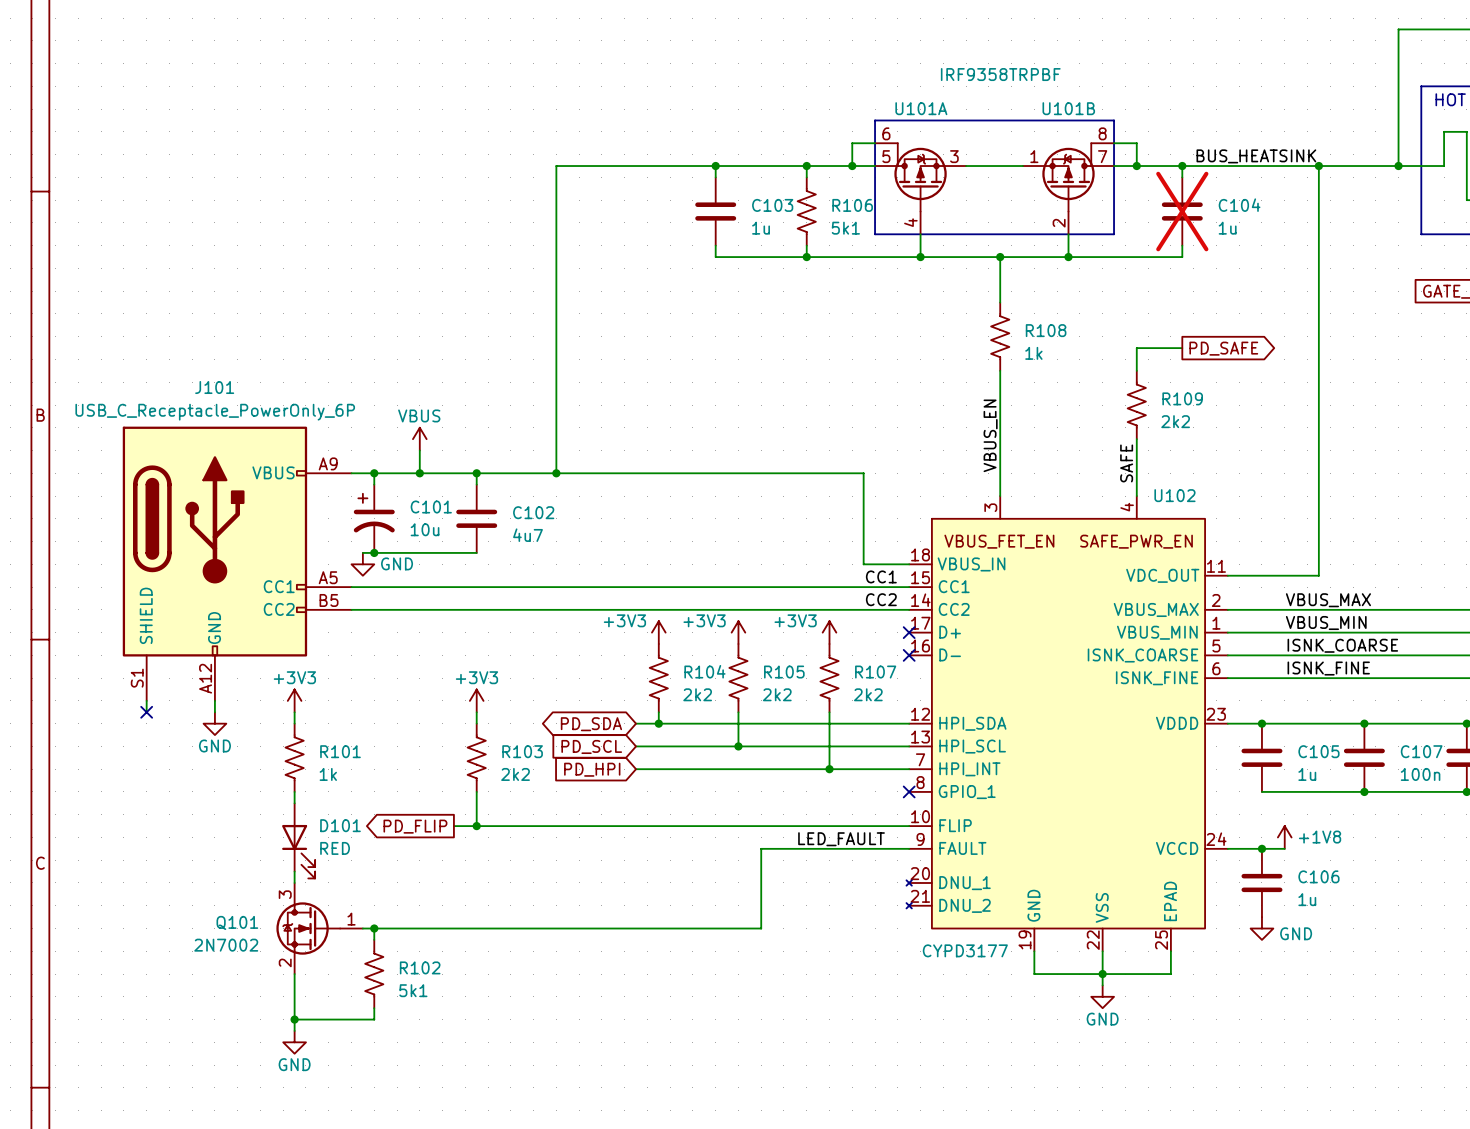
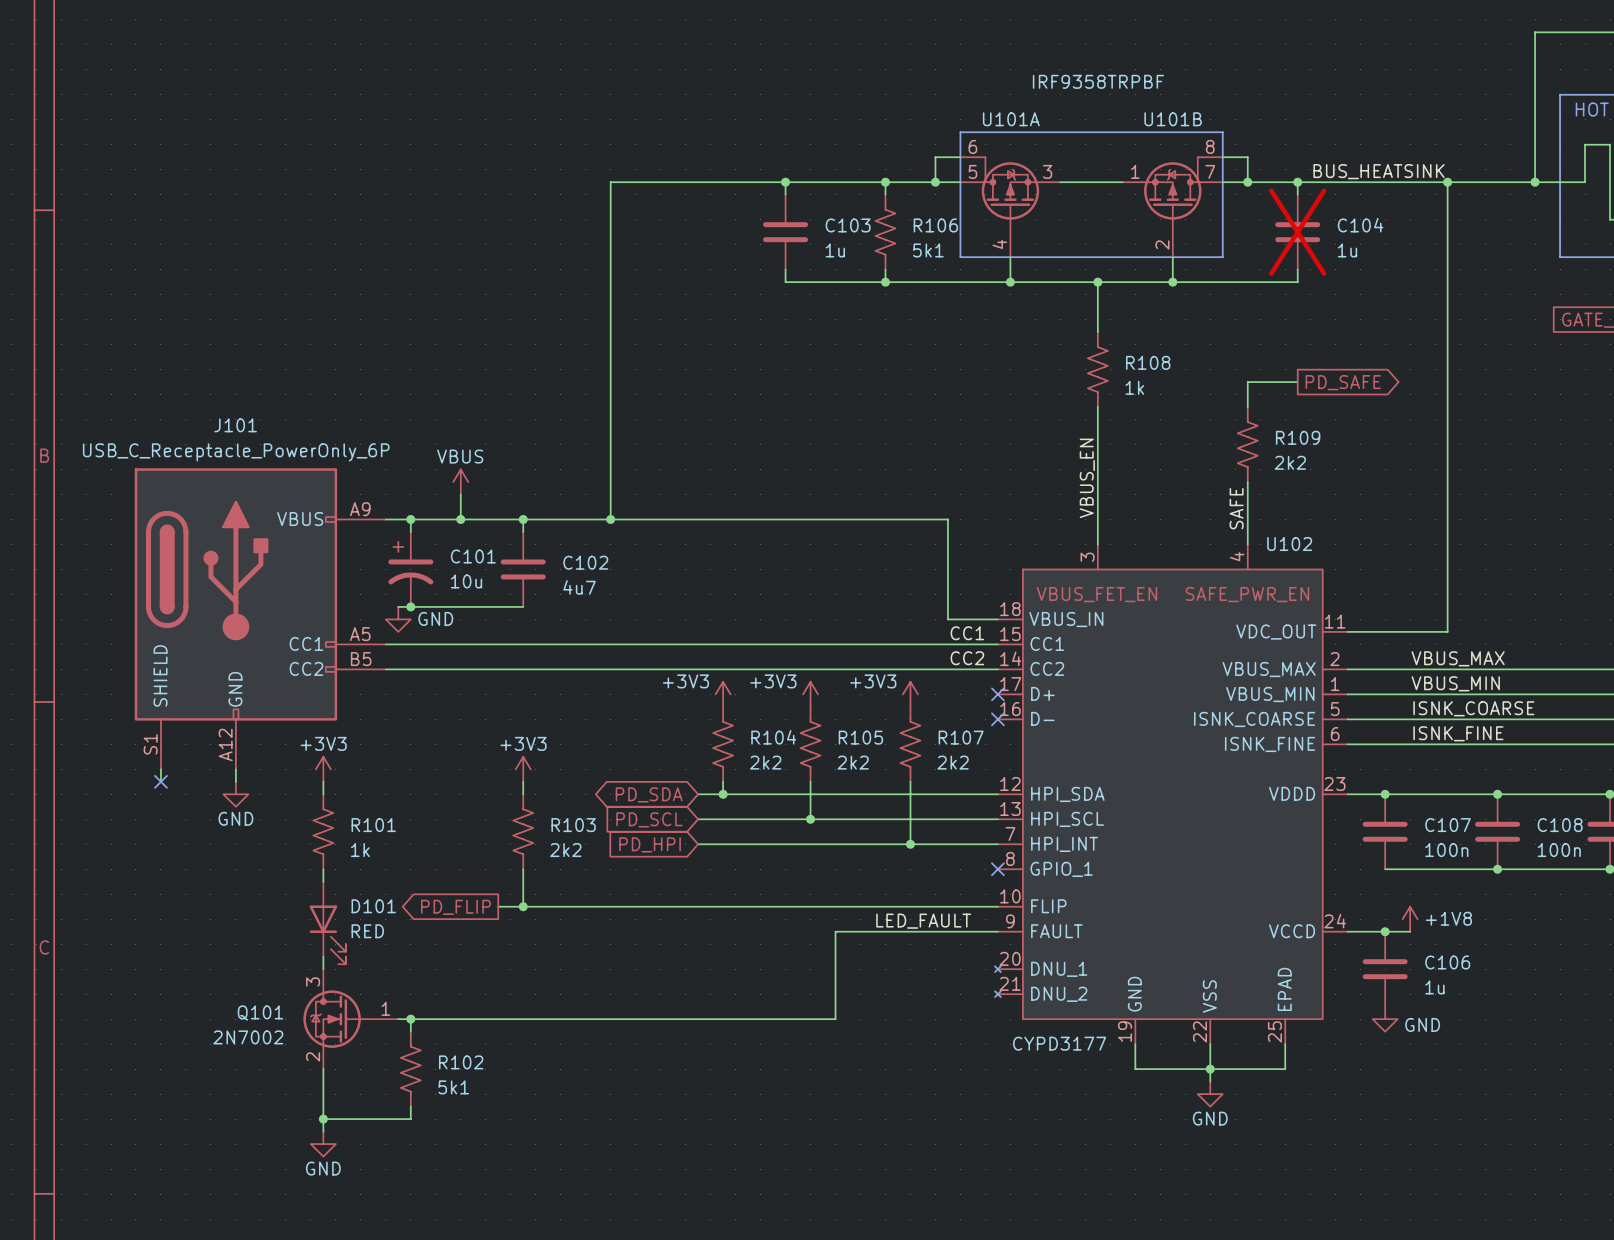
C105 name: C105 (1318, 751) -> C107 (1448, 825)
C107 name: C107 (1421, 751) -> C108 (1560, 825)
C105 value: 1u (1307, 774) -> 100n (1446, 850)

